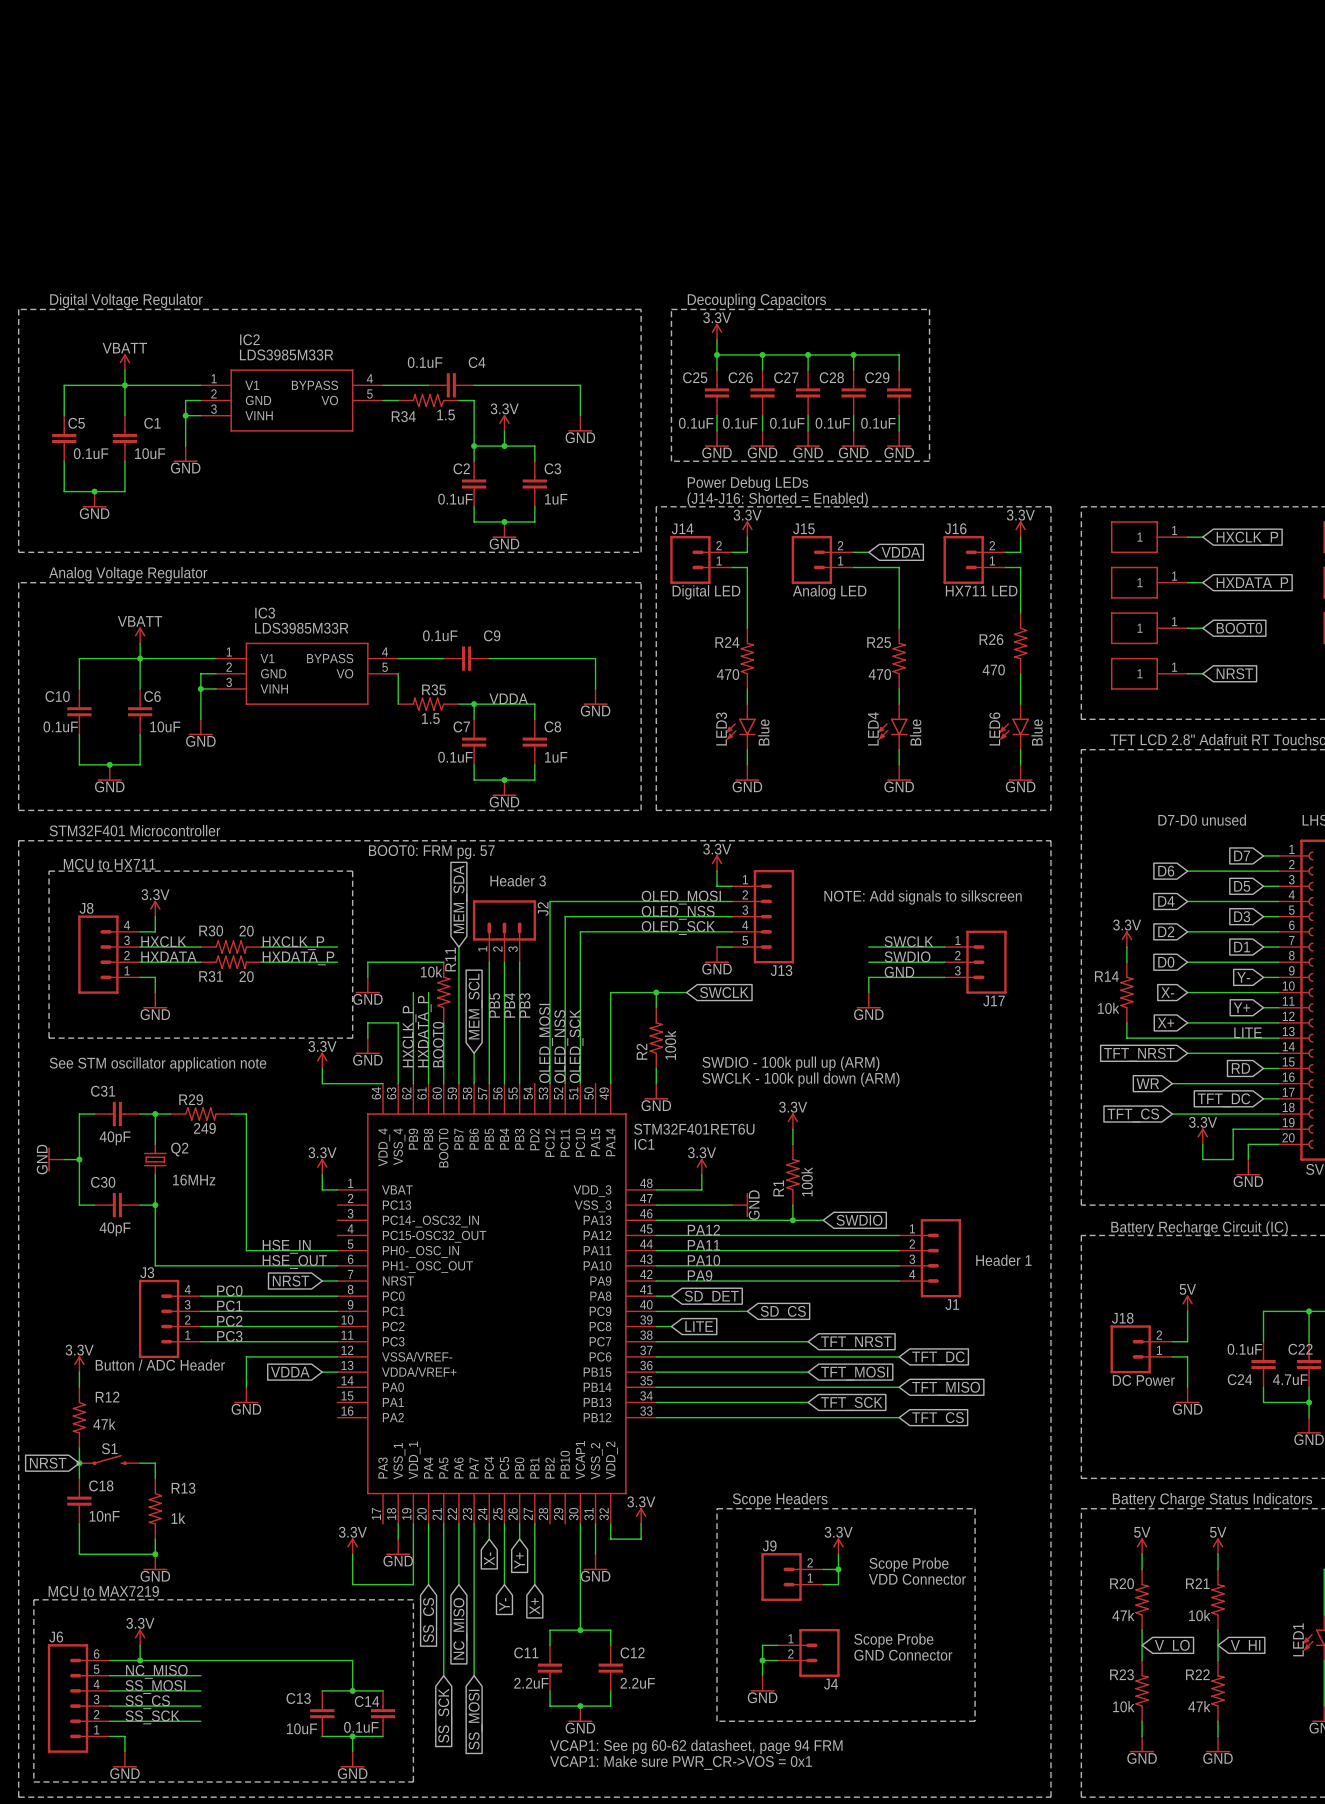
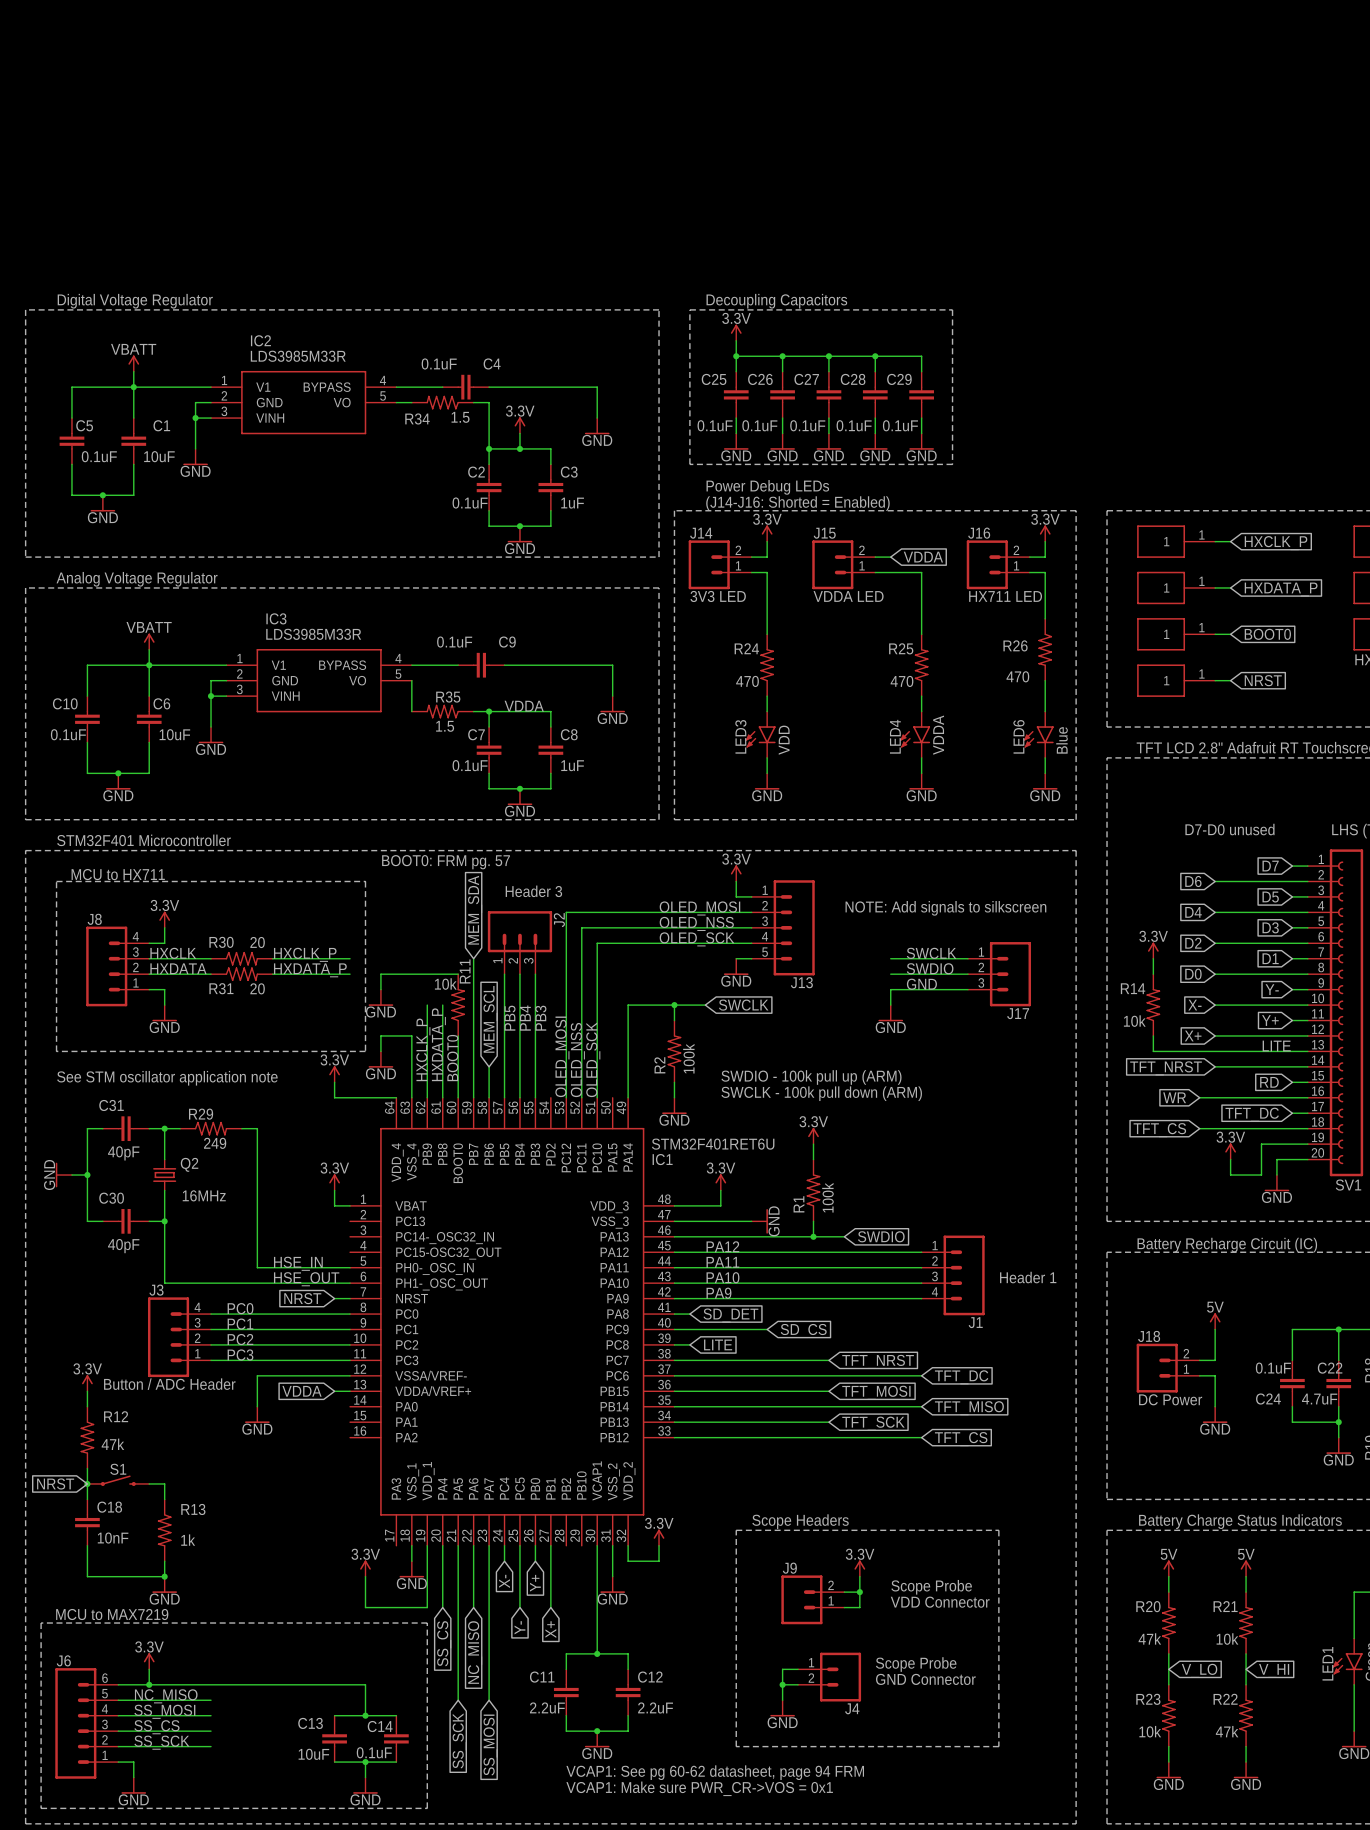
J14 value: Digital LED (706, 592) -> 3V3 LED (718, 596)
J15 value: Analog LED (829, 592) -> VDDA LED (848, 596)
LED3 value: Blue (763, 732) -> VDD (784, 740)
LED4 value: Blue (915, 732) -> VDDA (938, 735)

